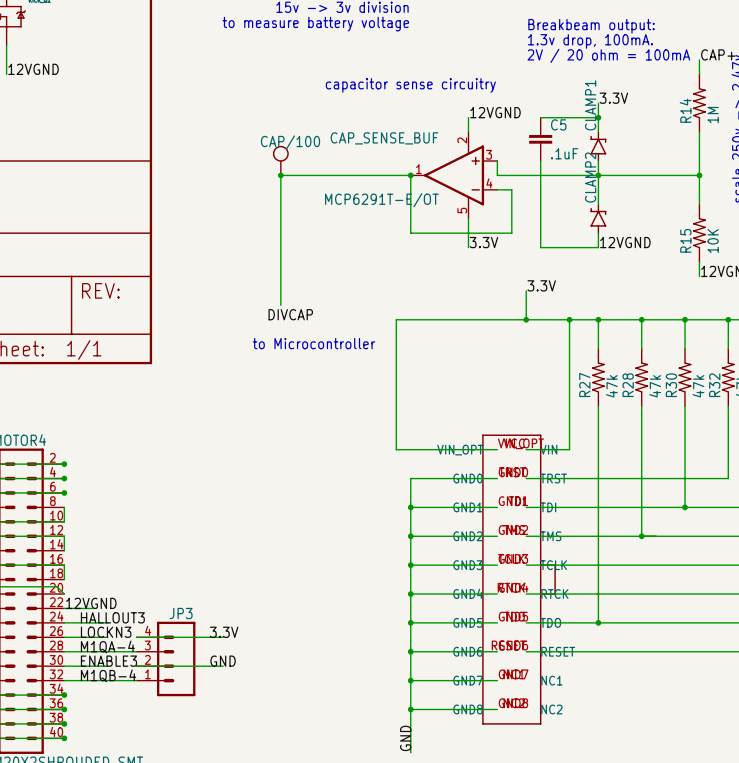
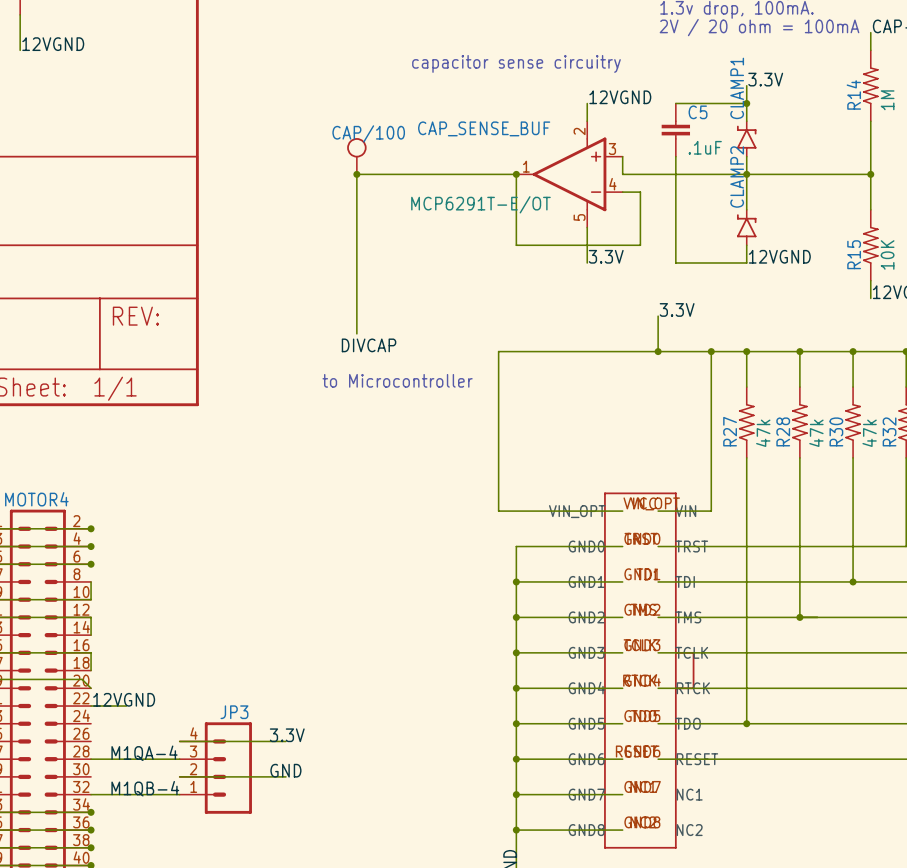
label: HALLOUT3 (112, 617) -> none
wire: (64, 622) (107, 622) -> none
label: LOCKN3 (106, 632) -> none
wire: (64, 637) (107, 637) -> none
label: ENABLE3 (108, 661) -> none
wire: (64, 666) (107, 666) -> none

